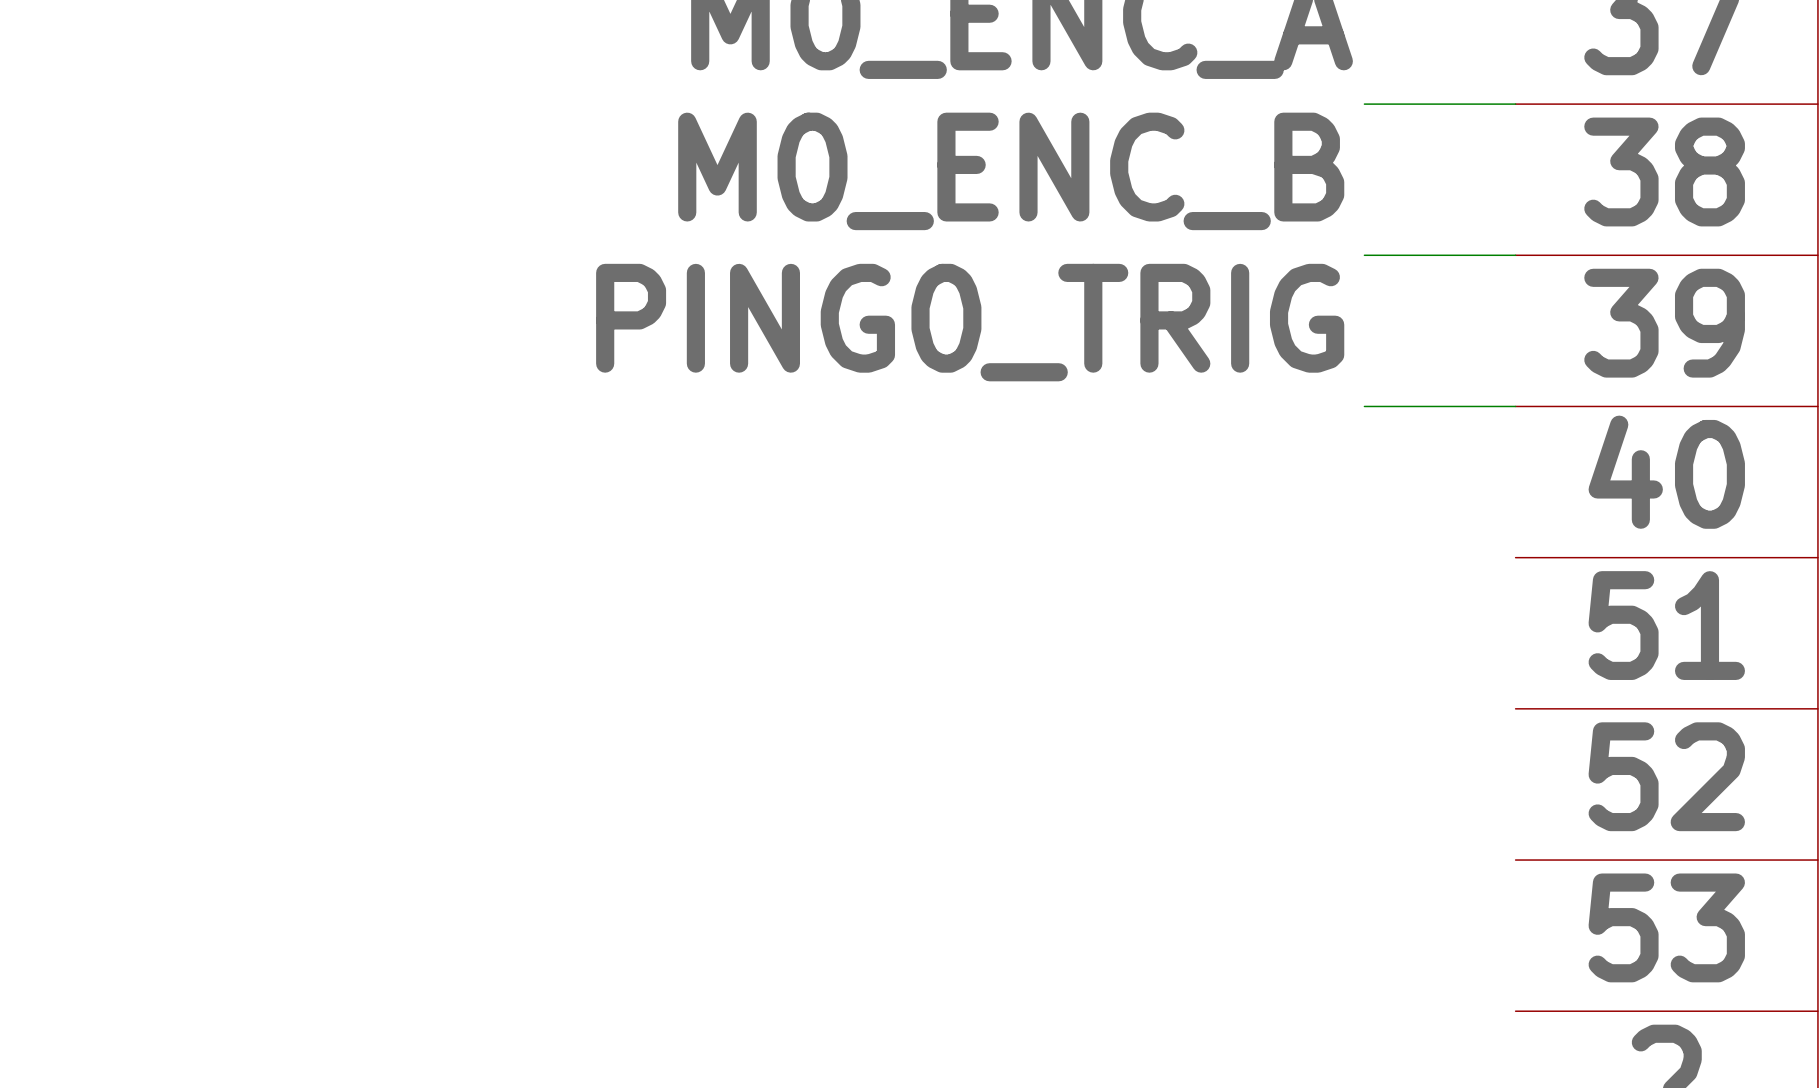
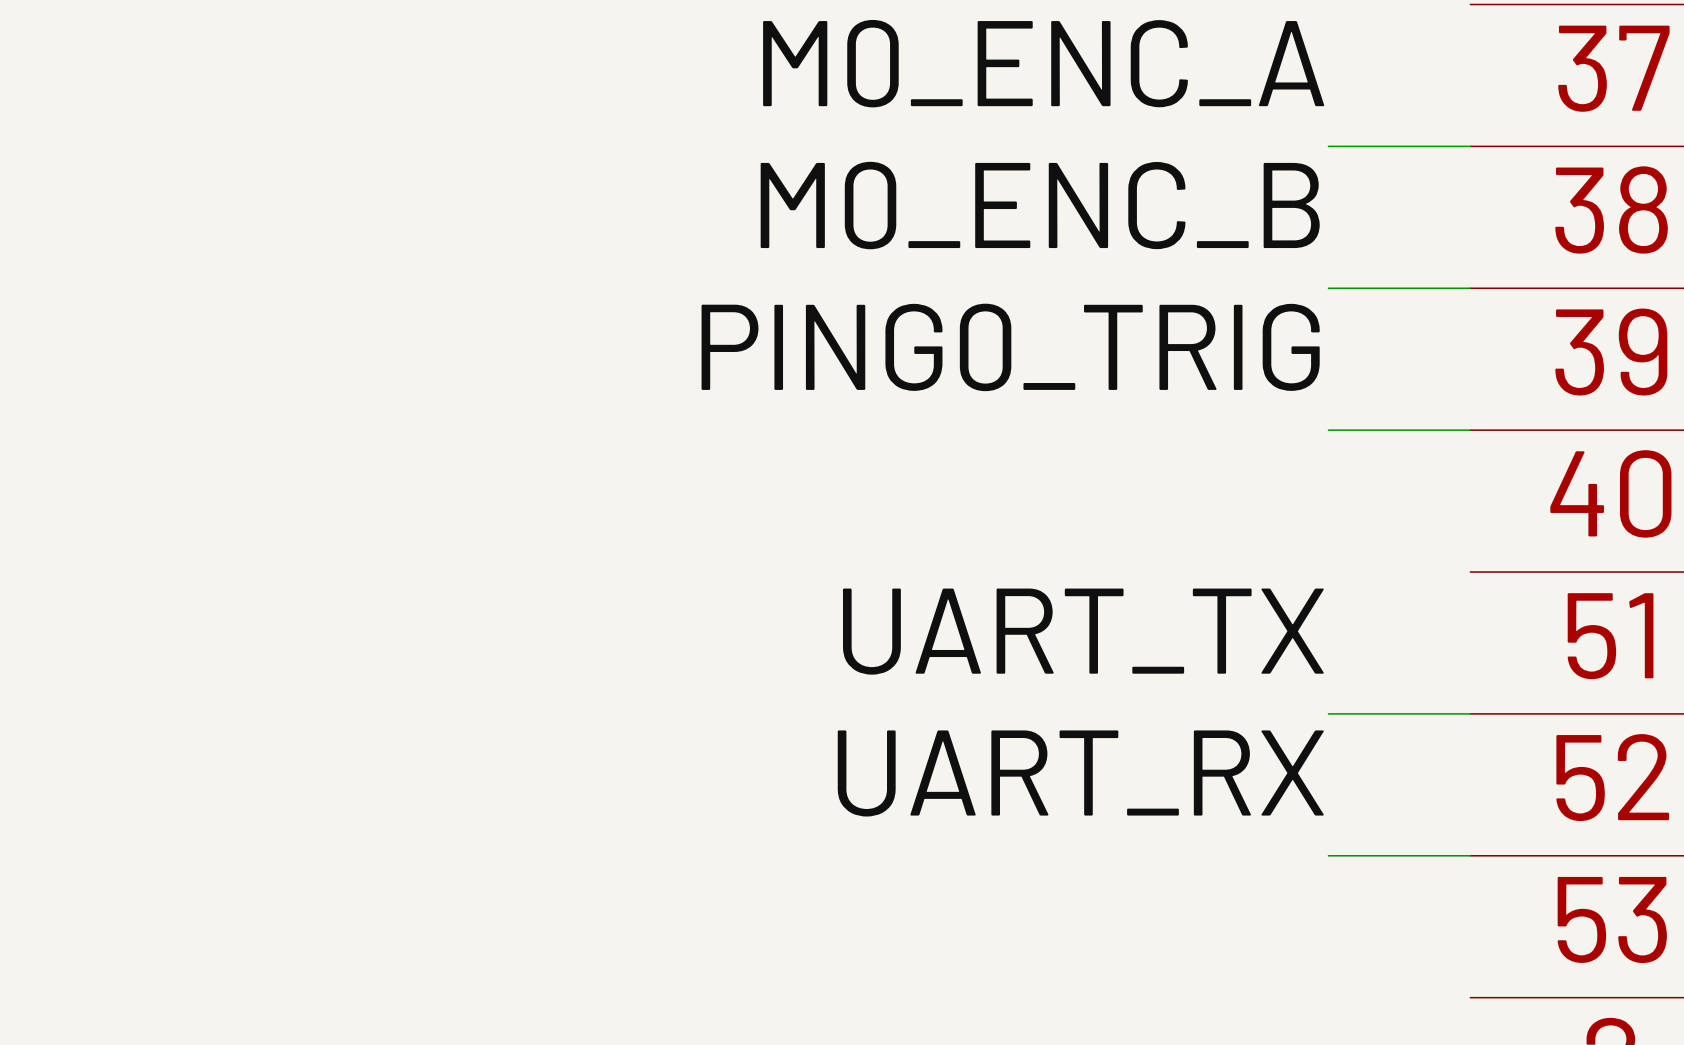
label: none -> UART_TX (1083, 631)
wire: none -> (1328, 713) (1470, 713)
label: none -> UART_RX (1080, 773)
wire: none -> (1328, 855) (1470, 855)

